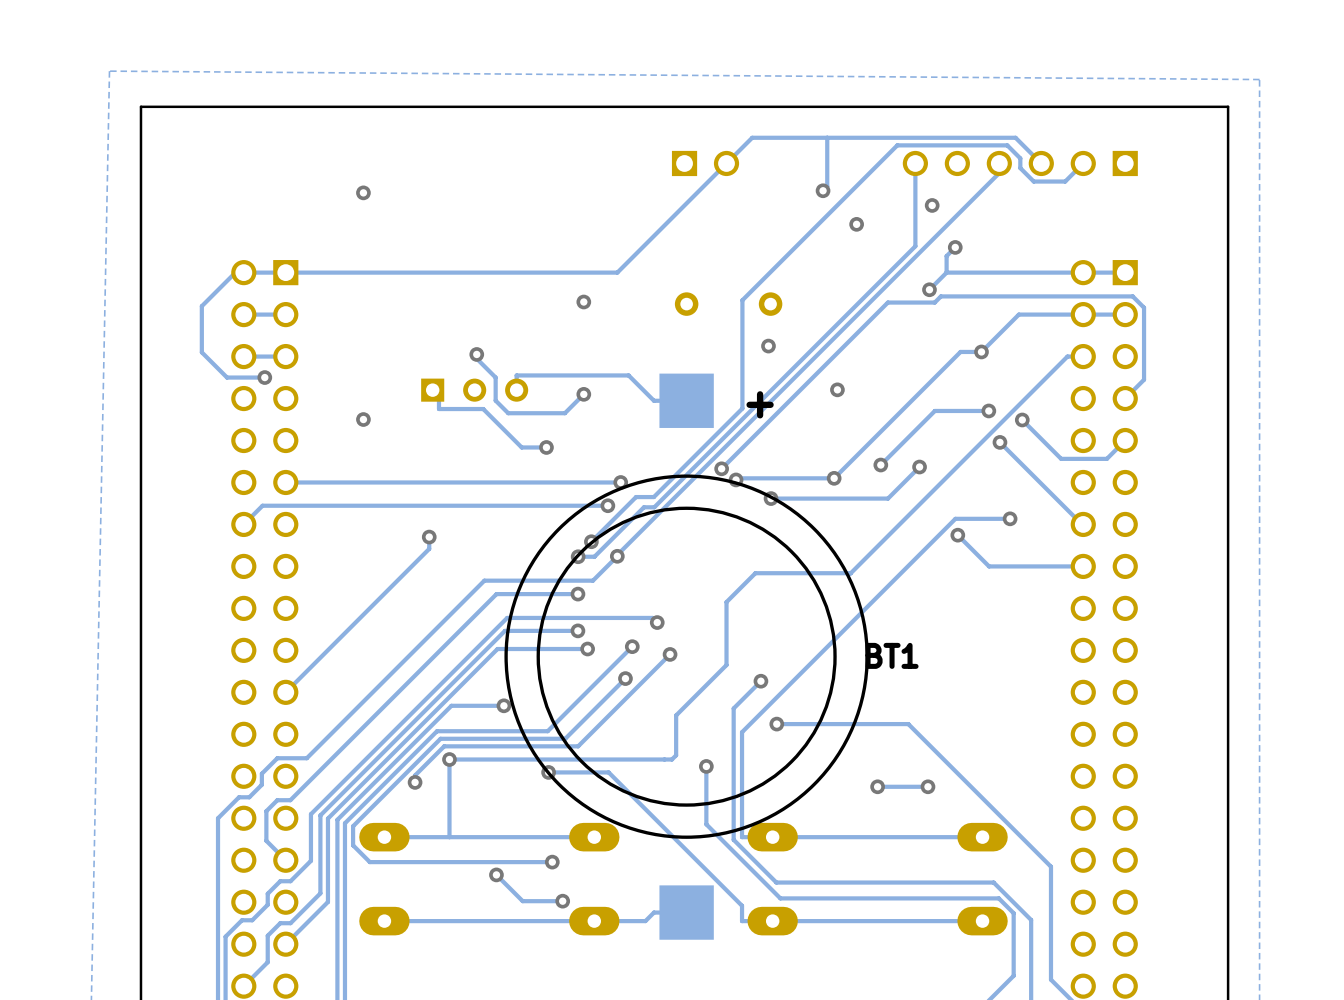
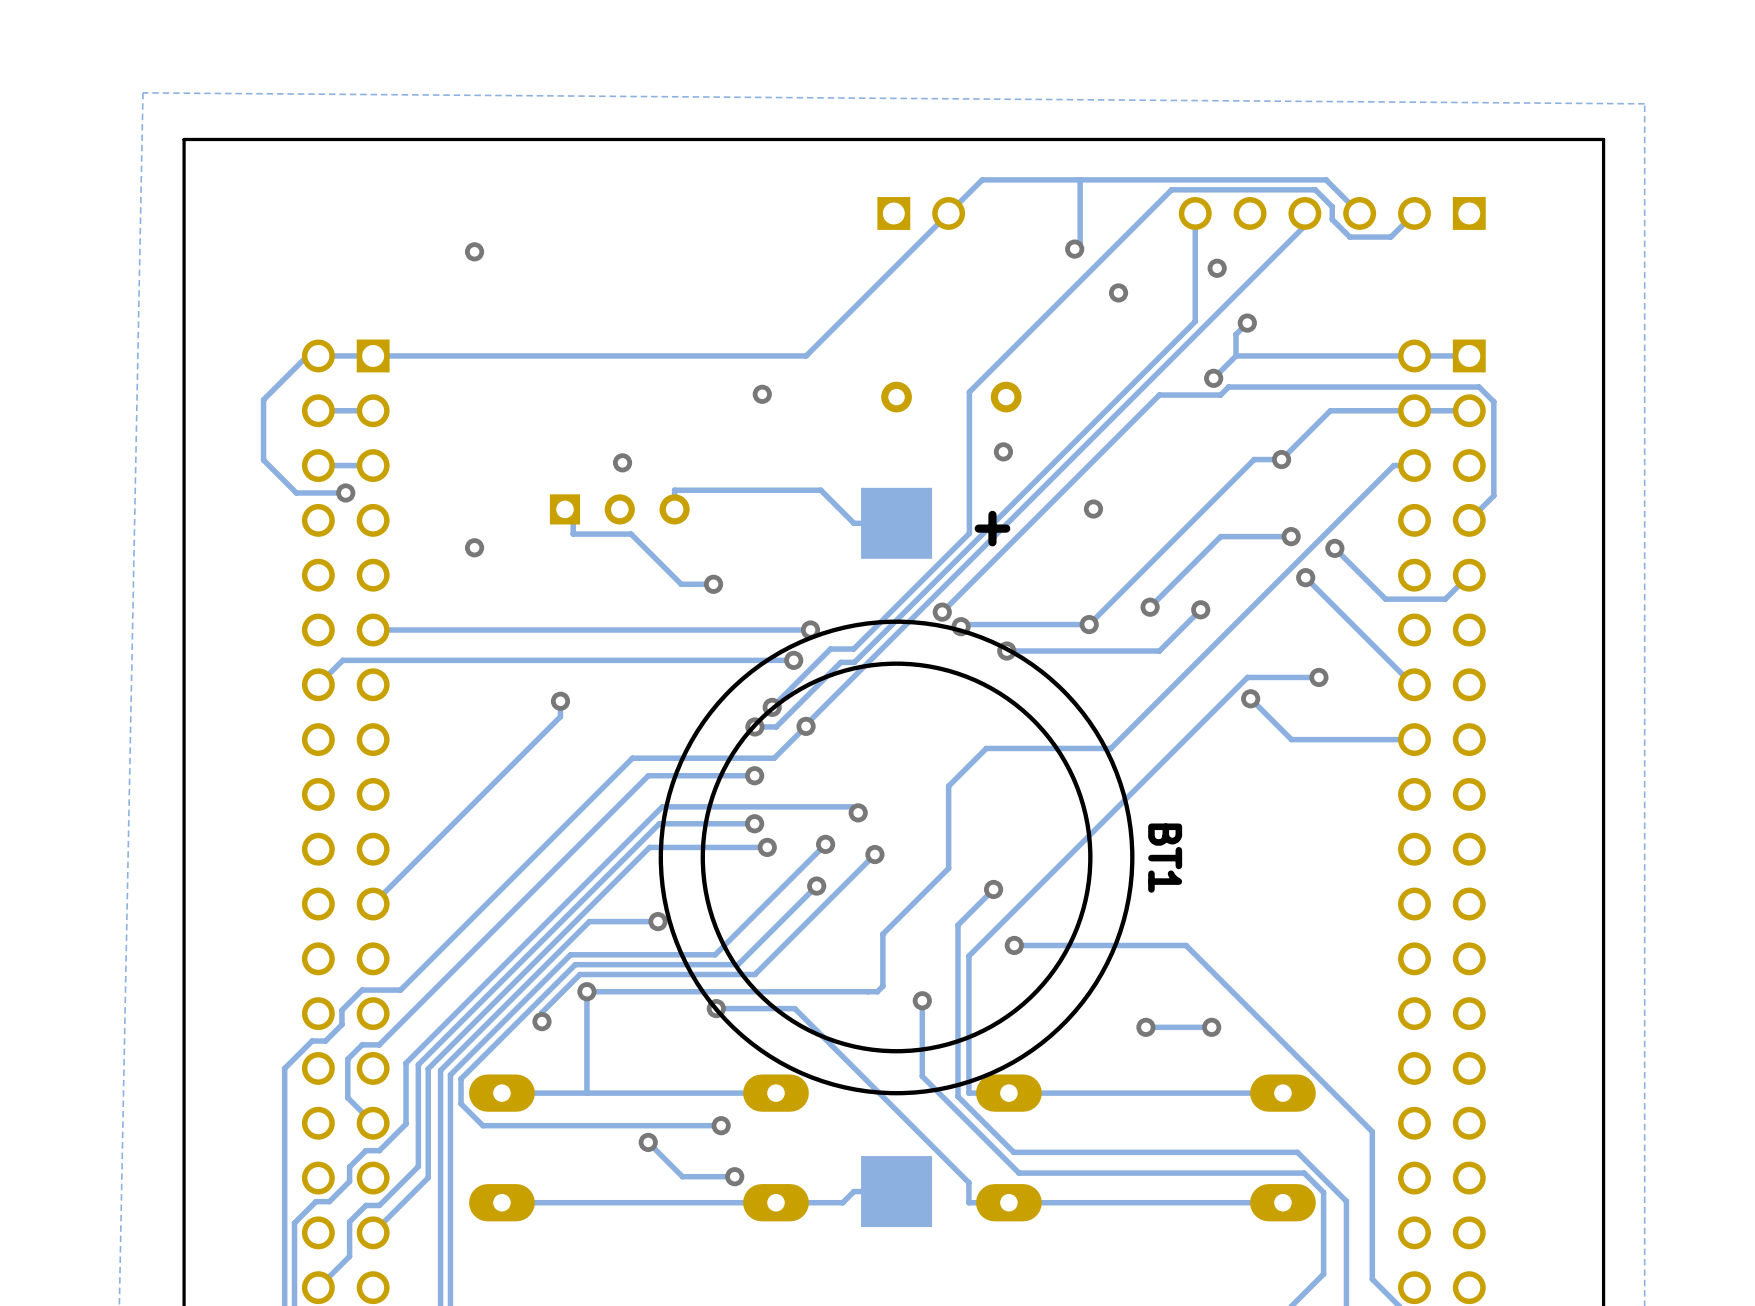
track: (476, 354) (476, 358) (495, 377) (495, 400) (508, 413) (564, 413) (583, 394) -> none
via: (583, 394) -> none
BT1 name rotation: 0° (892, 655) -> 90° clockwise (1165, 858)

